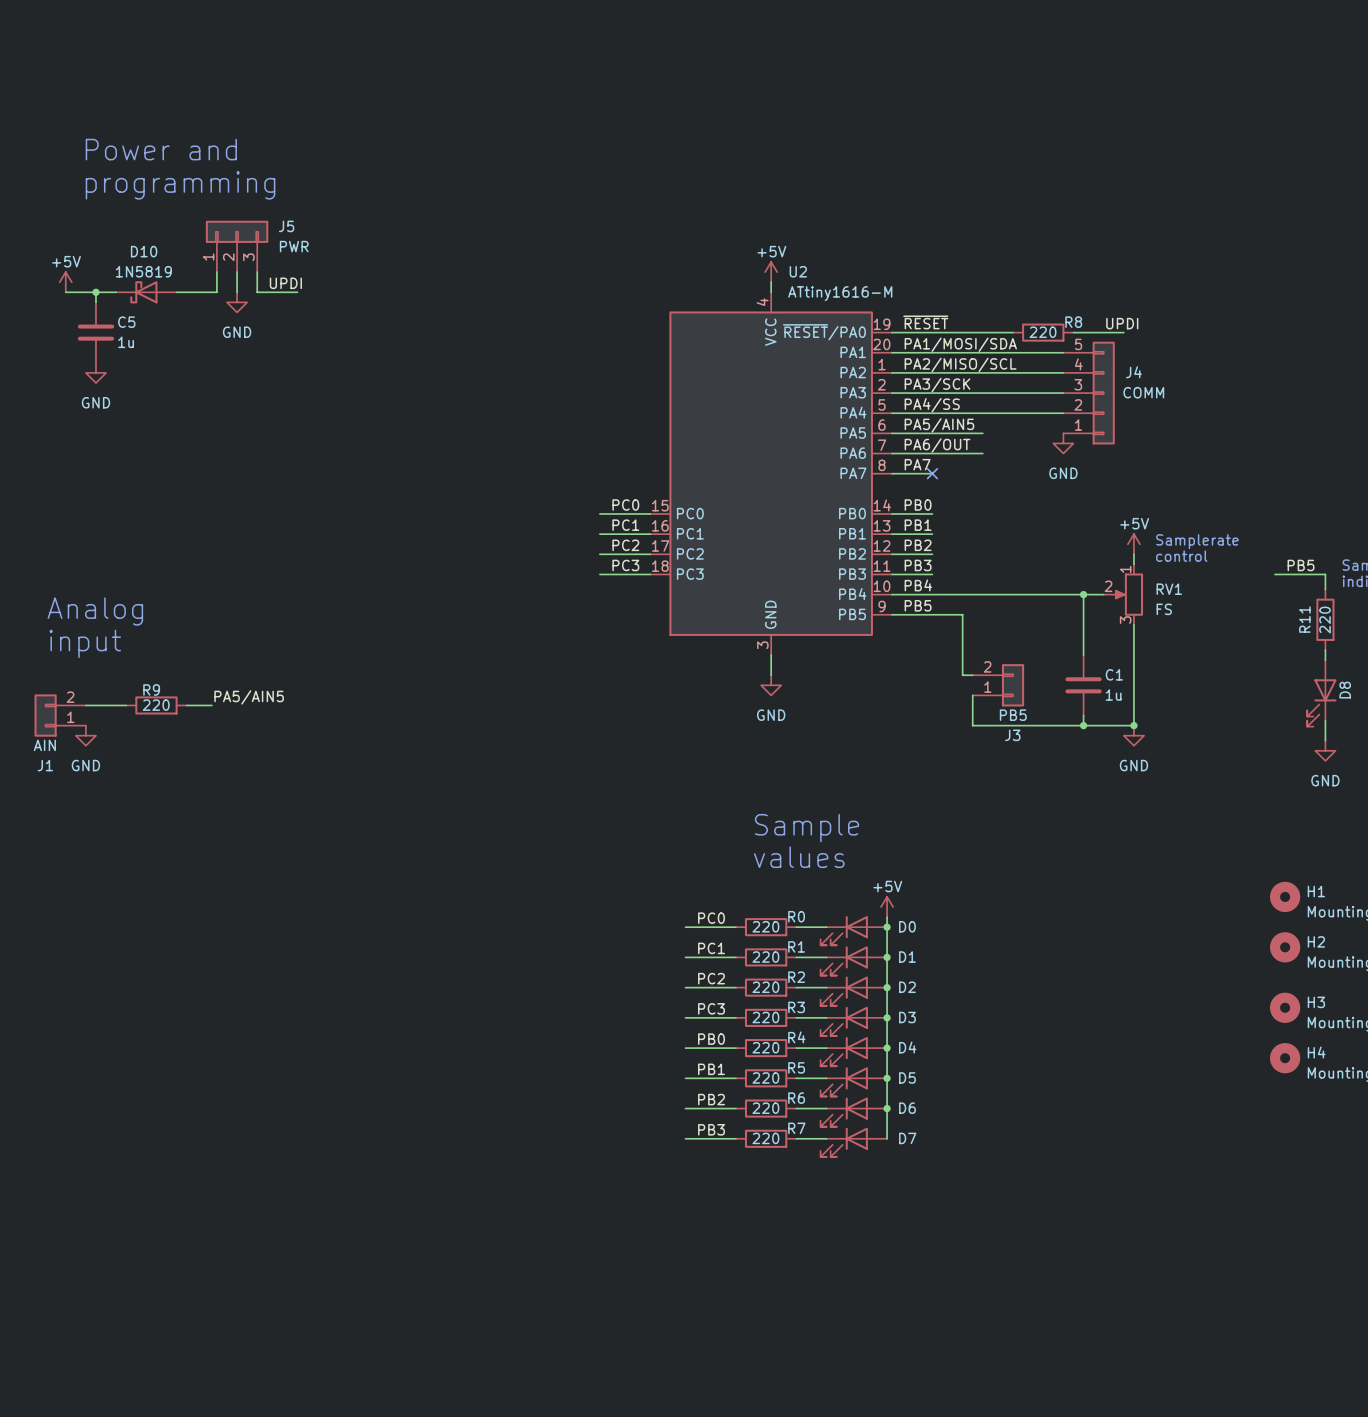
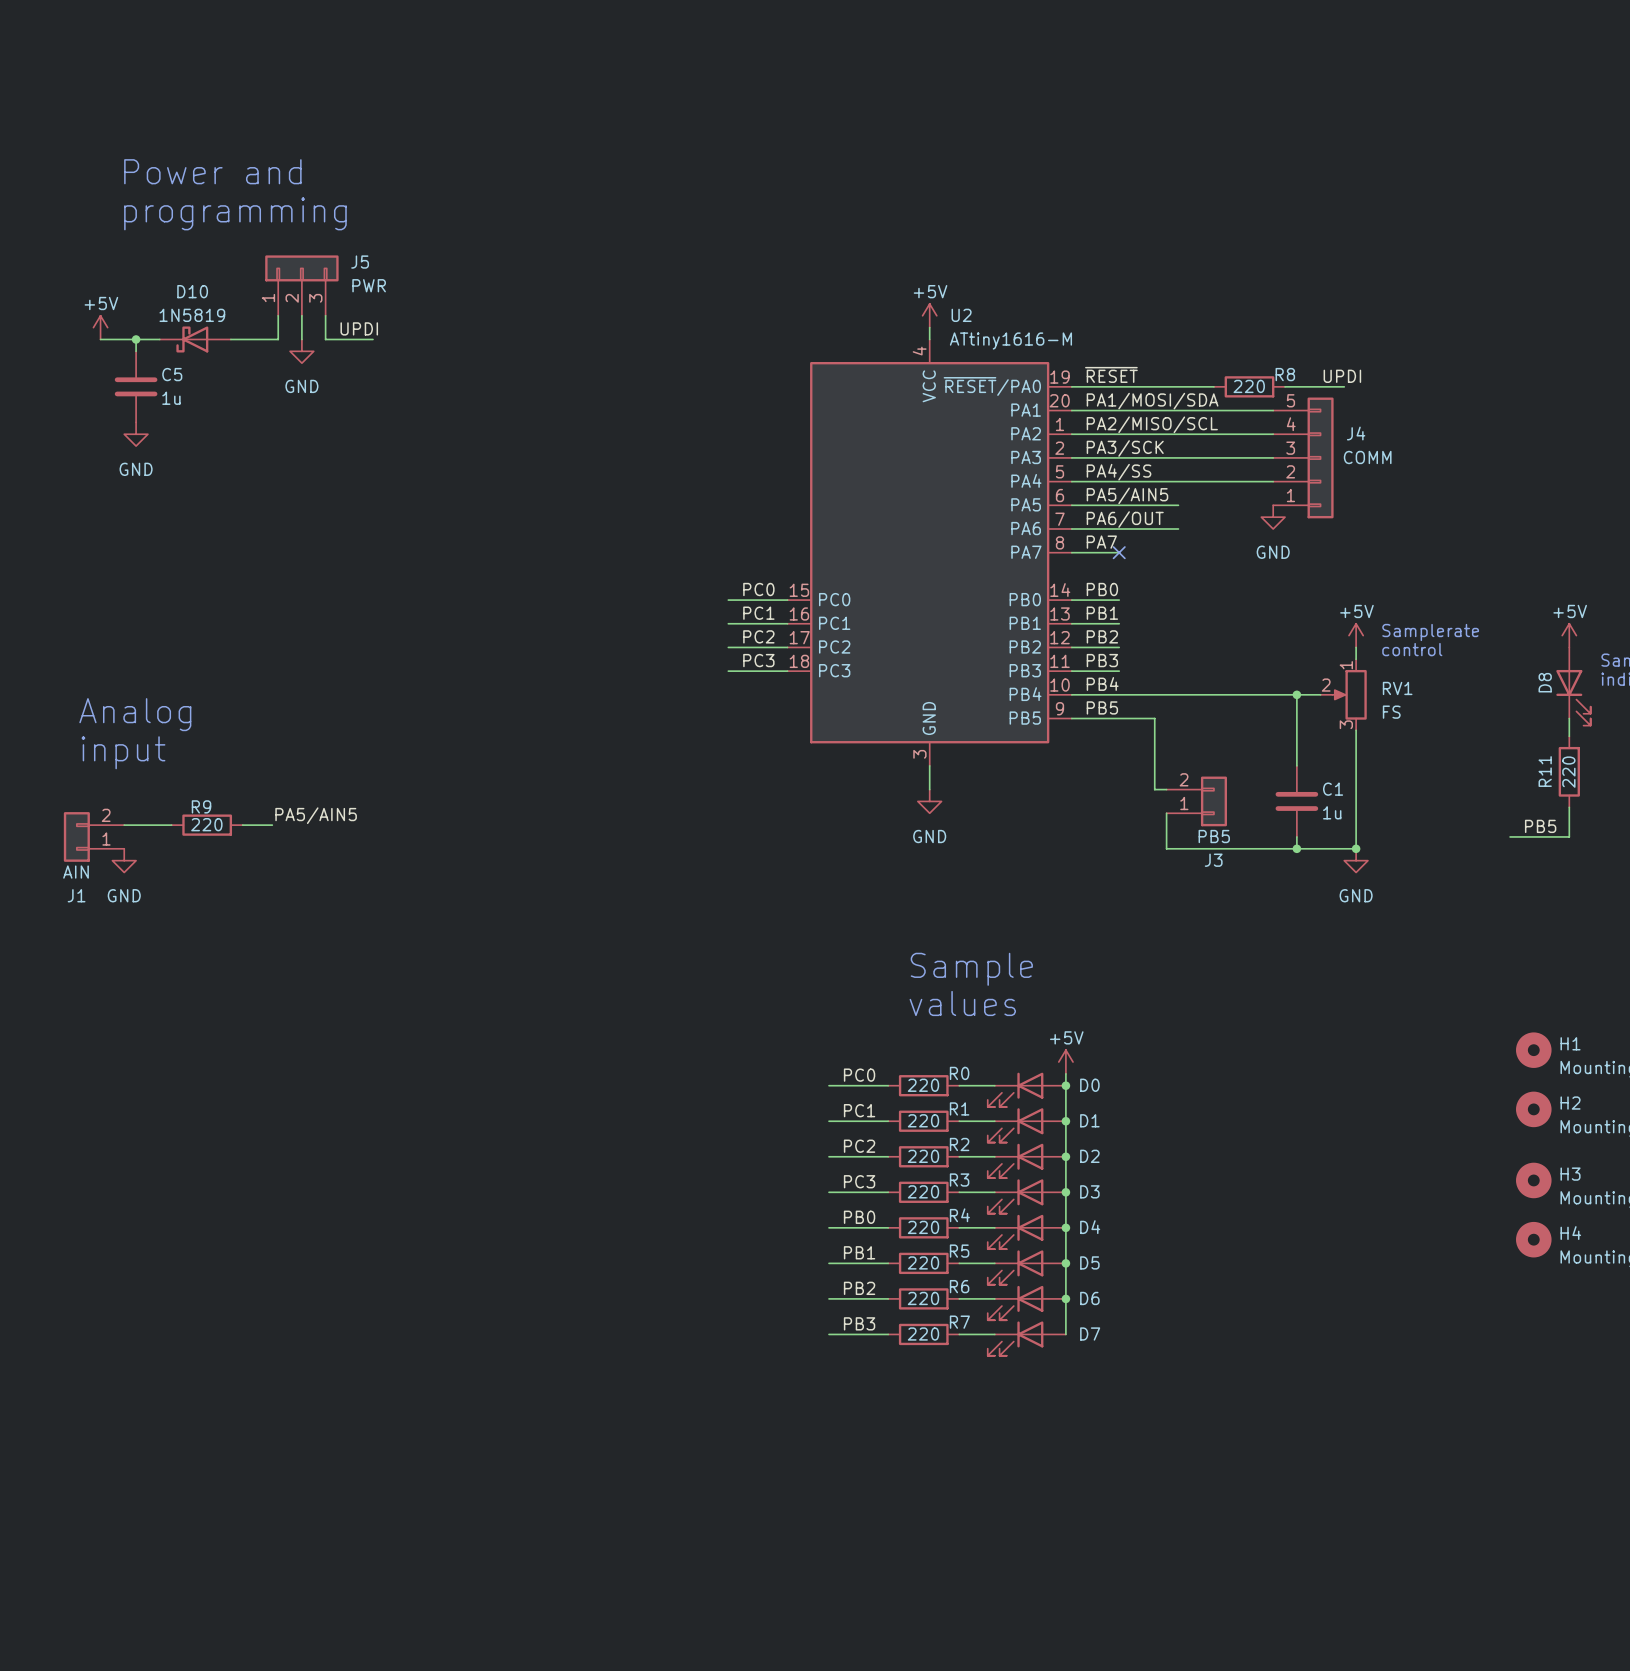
power symbol: none -> +5V (1569, 635)
label position: PB5 (1301, 565) -> PB5 (1540, 826)
wire: (1275, 574) (1325, 574) (1325, 589) -> none
wire: none -> (1569, 718) (1569, 736)
R11 position: (1325, 619) -> (1569, 771)
wire: (1325, 650) (1325, 660) -> none
wire: none -> (1569, 807) (1569, 836) (1510, 836)
D8 position: (1321, 693) -> (1573, 686)
D8 flip: as is (1321, 702) -> left-right (1573, 697)
wire: (1325, 720) (1325, 740) -> none
power symbol: GND (1325, 750) -> none

